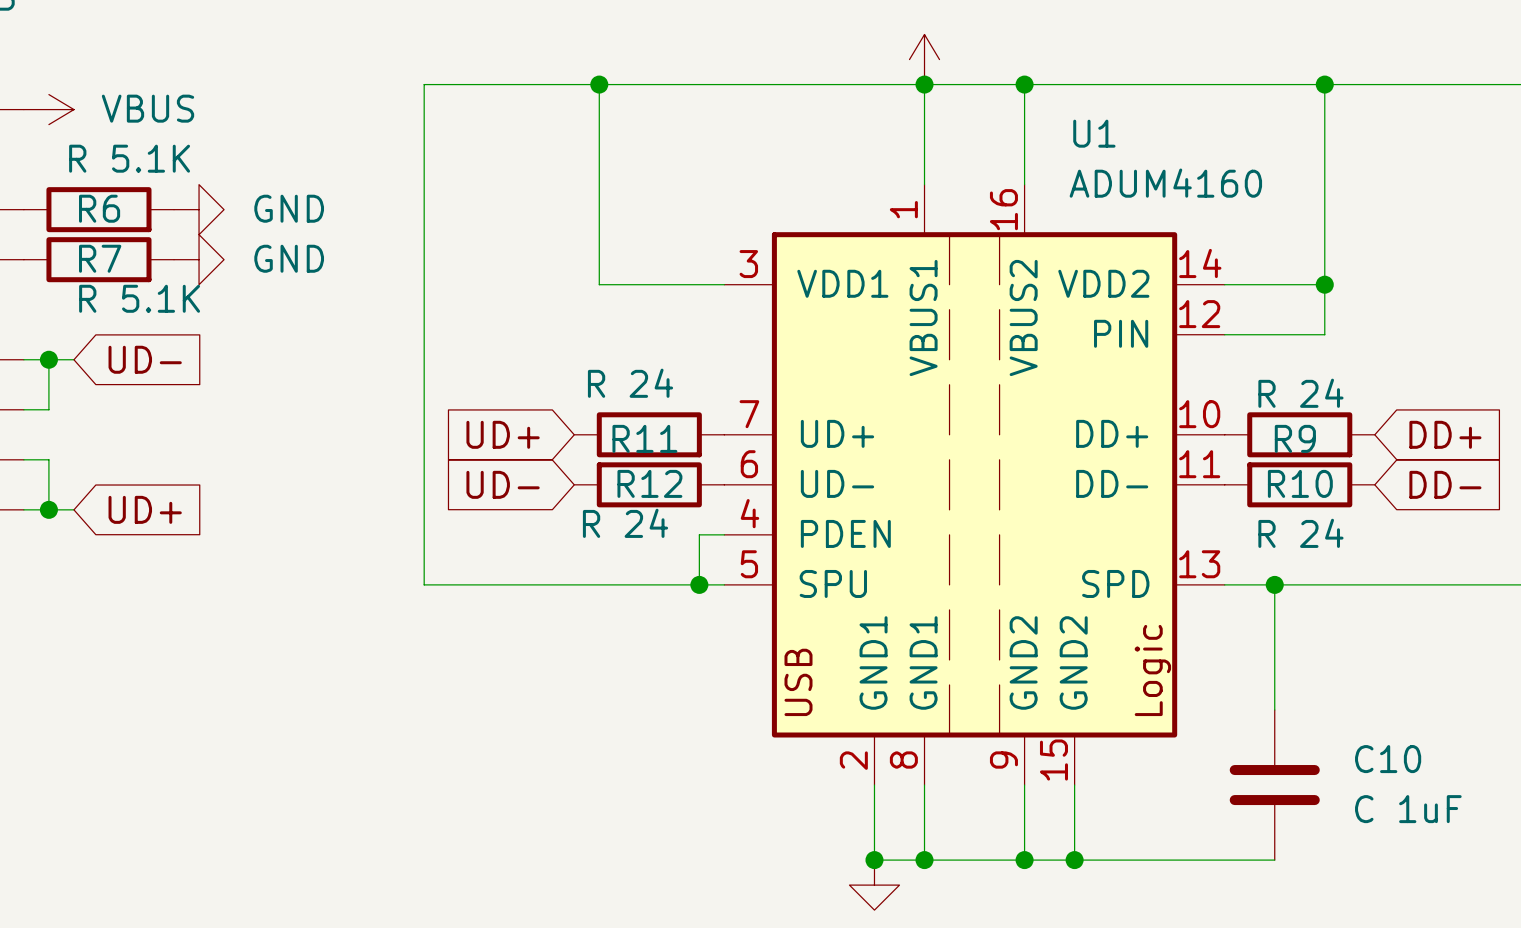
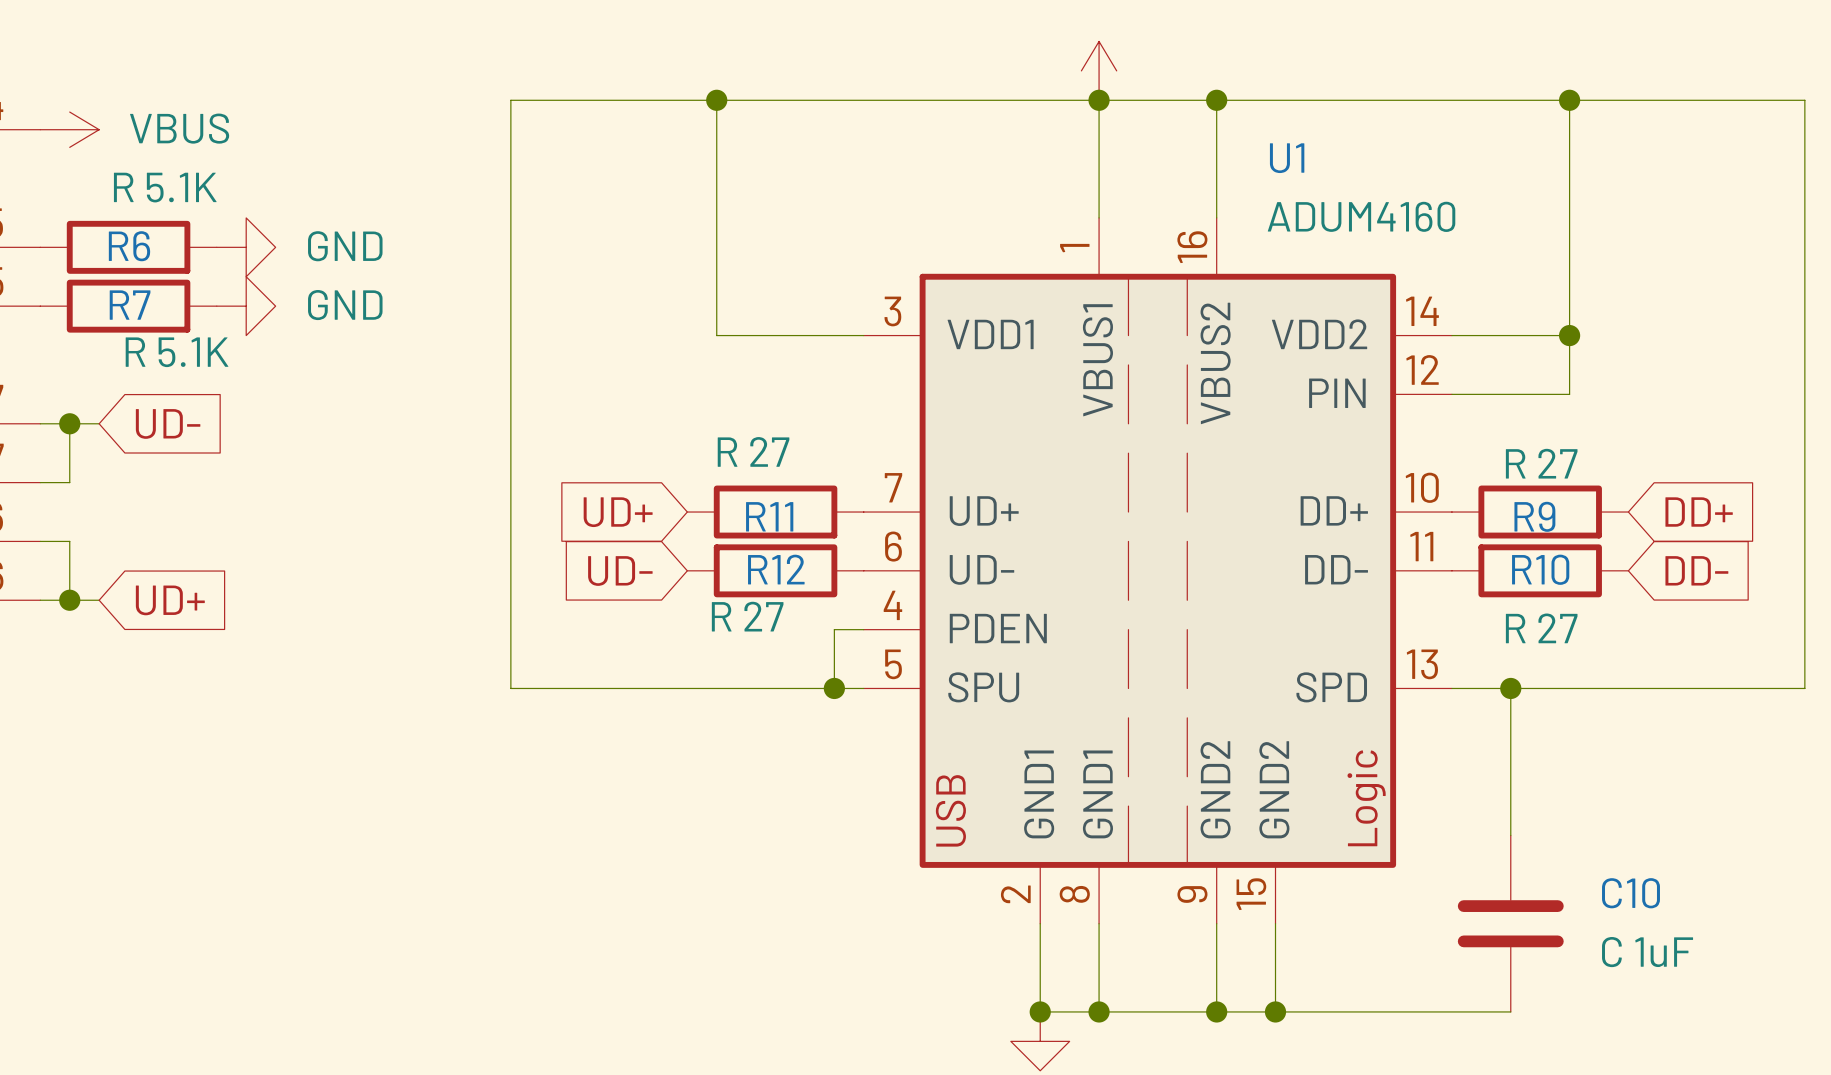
R11 value: R 24 (630, 383) -> R 27 (753, 451)
R9 value: R 24 (1300, 393) -> R 27 (1541, 463)
R12 value: R 24 (625, 523) -> R 27 (747, 616)
R10 value: R 24 (1300, 533) -> R 27 (1541, 628)

